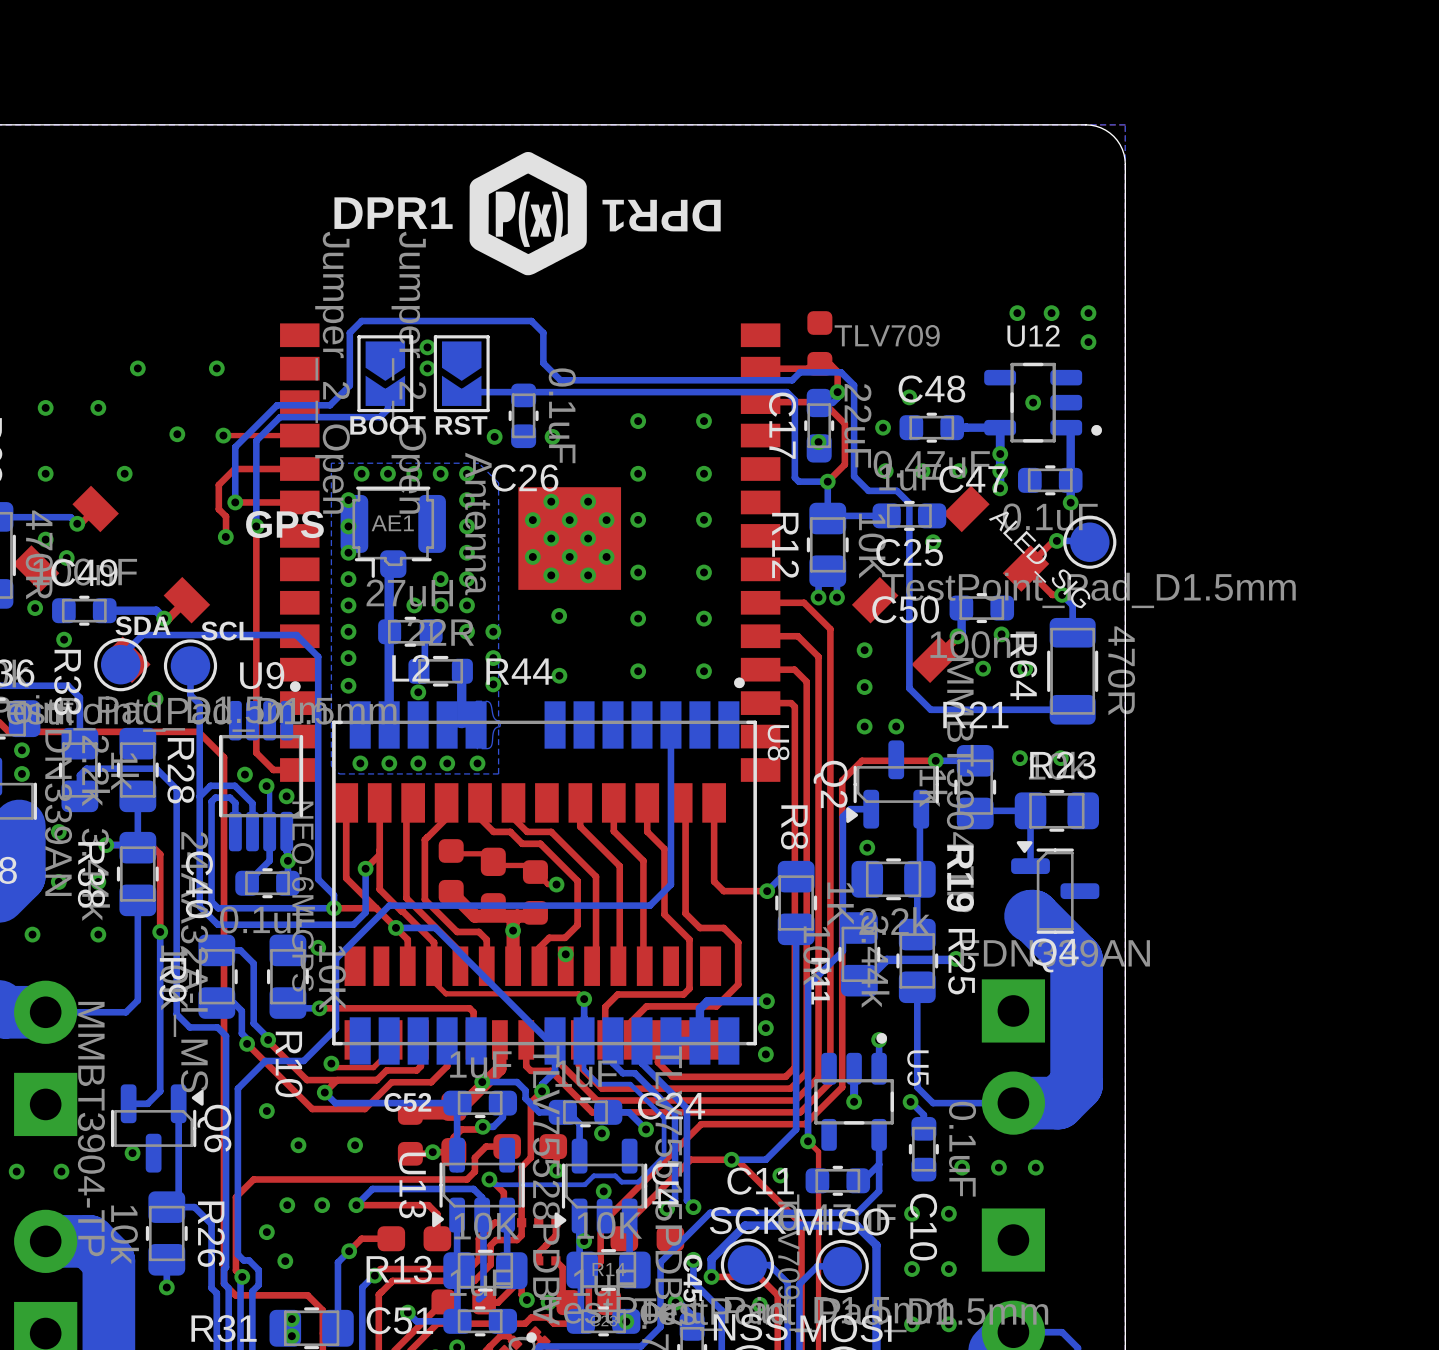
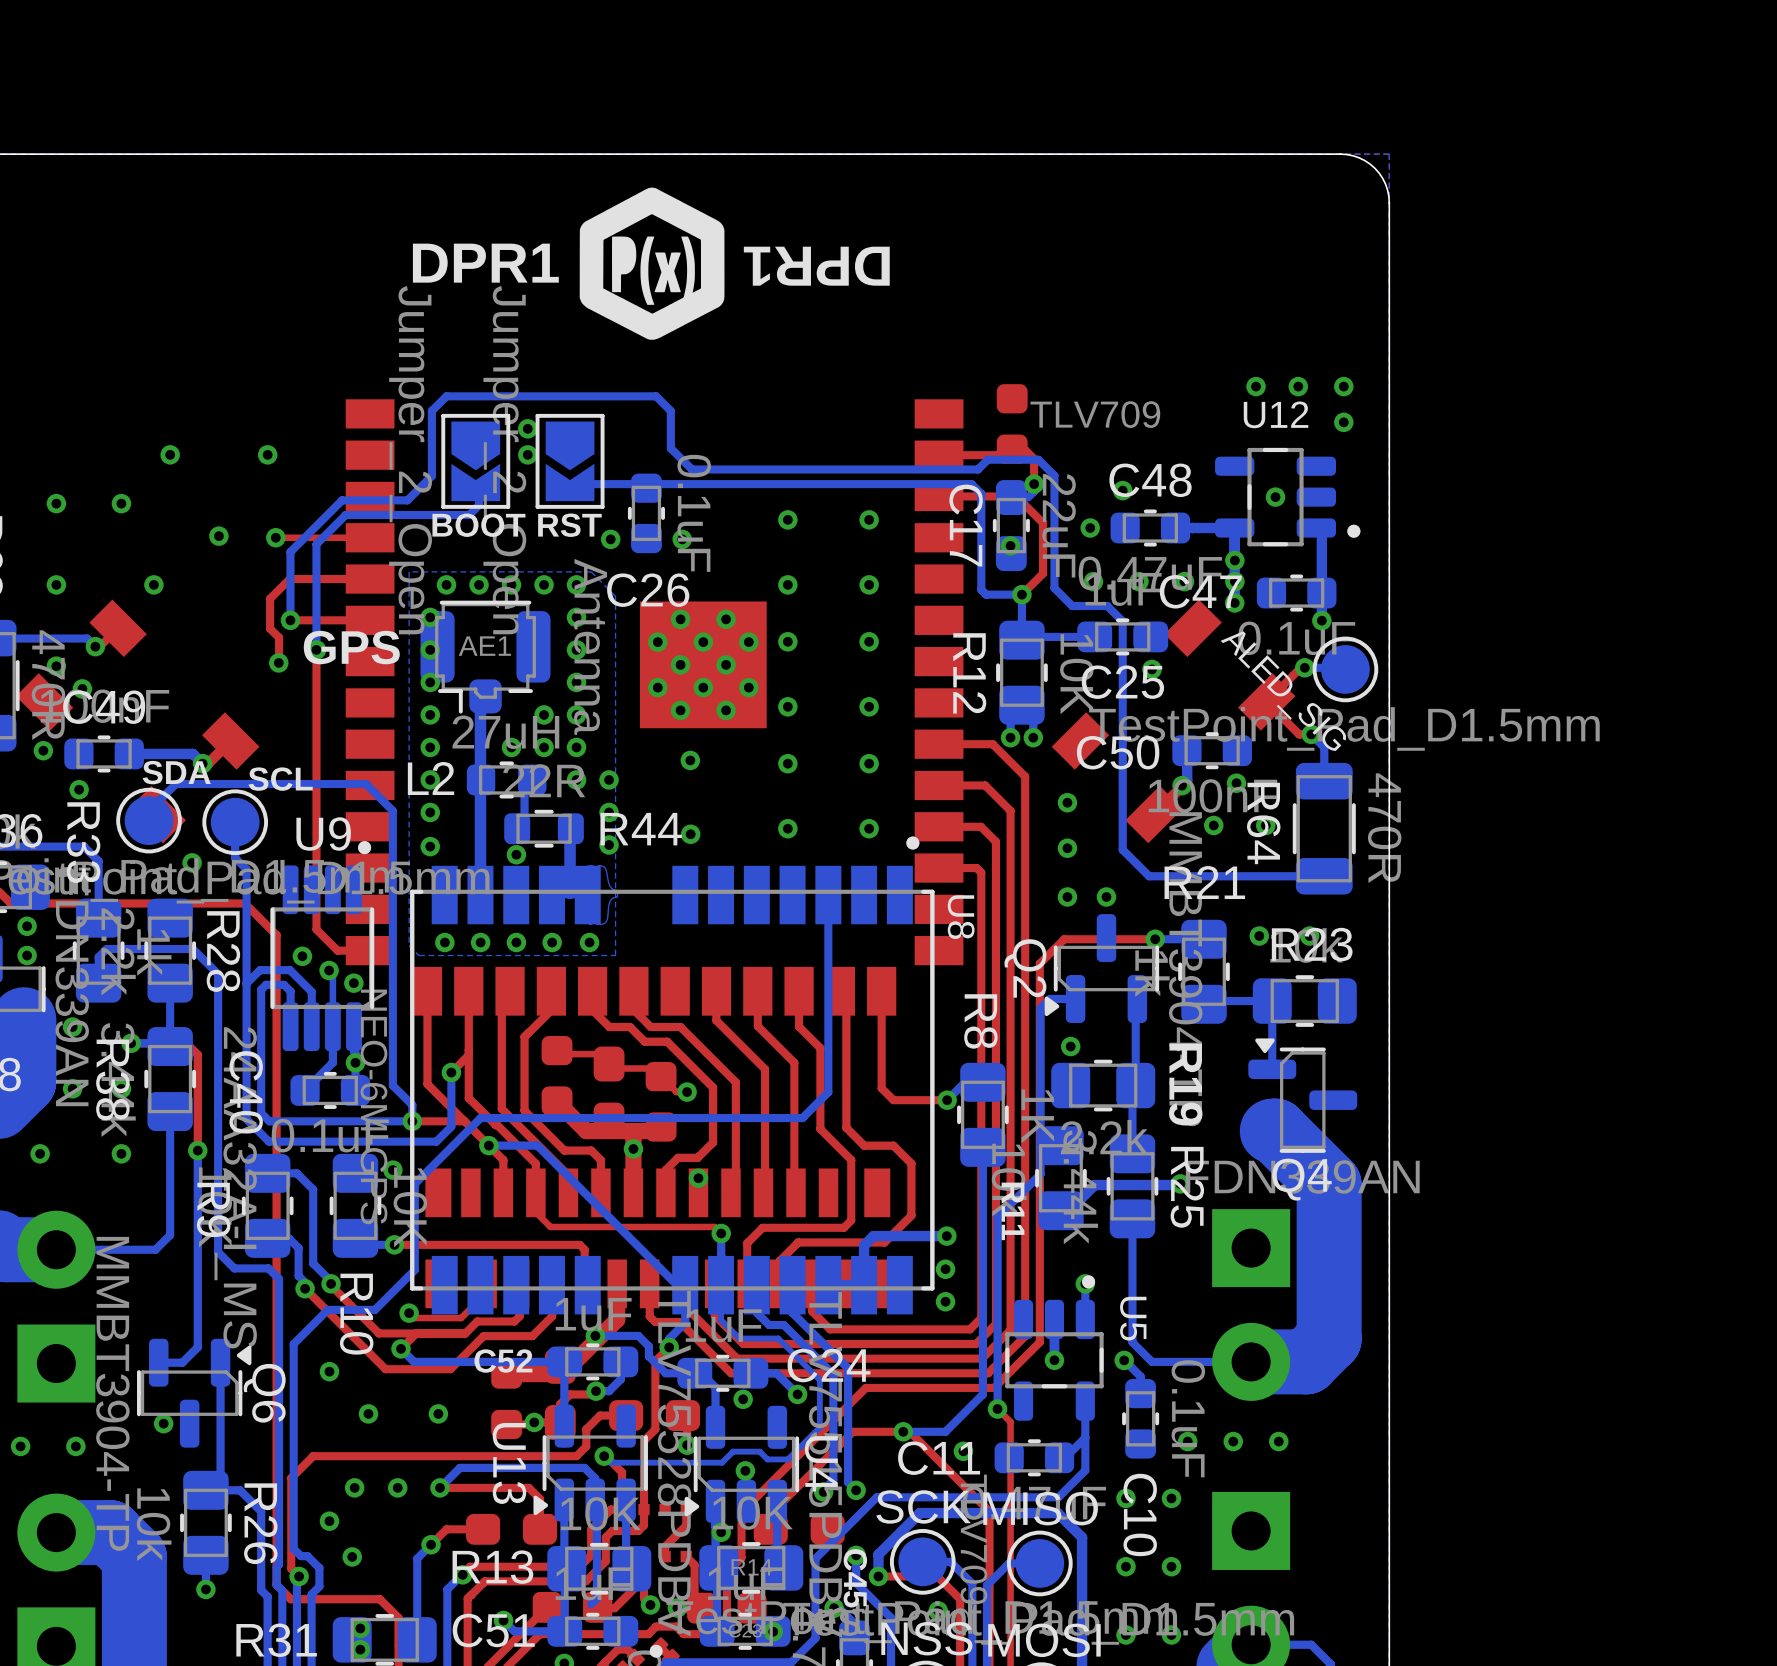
L2 name position: L2 (410, 668) -> L2 (431, 778)

